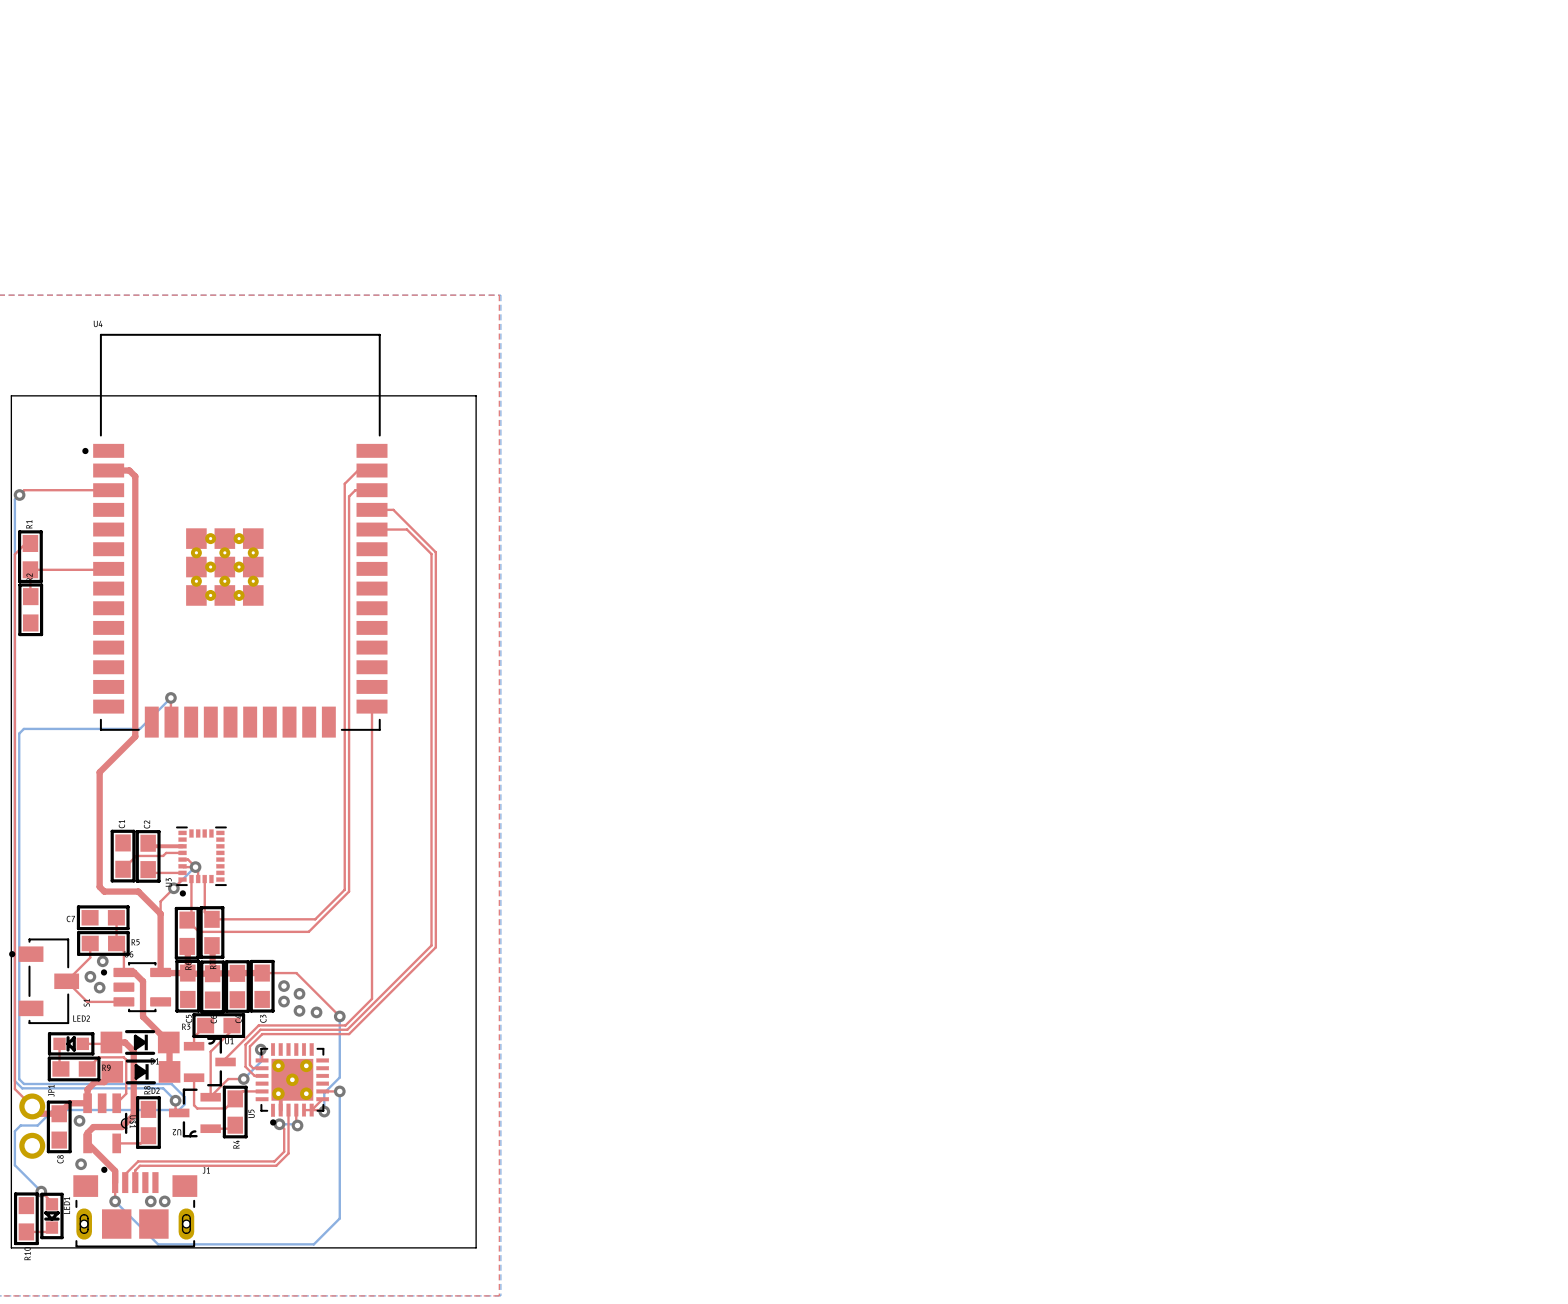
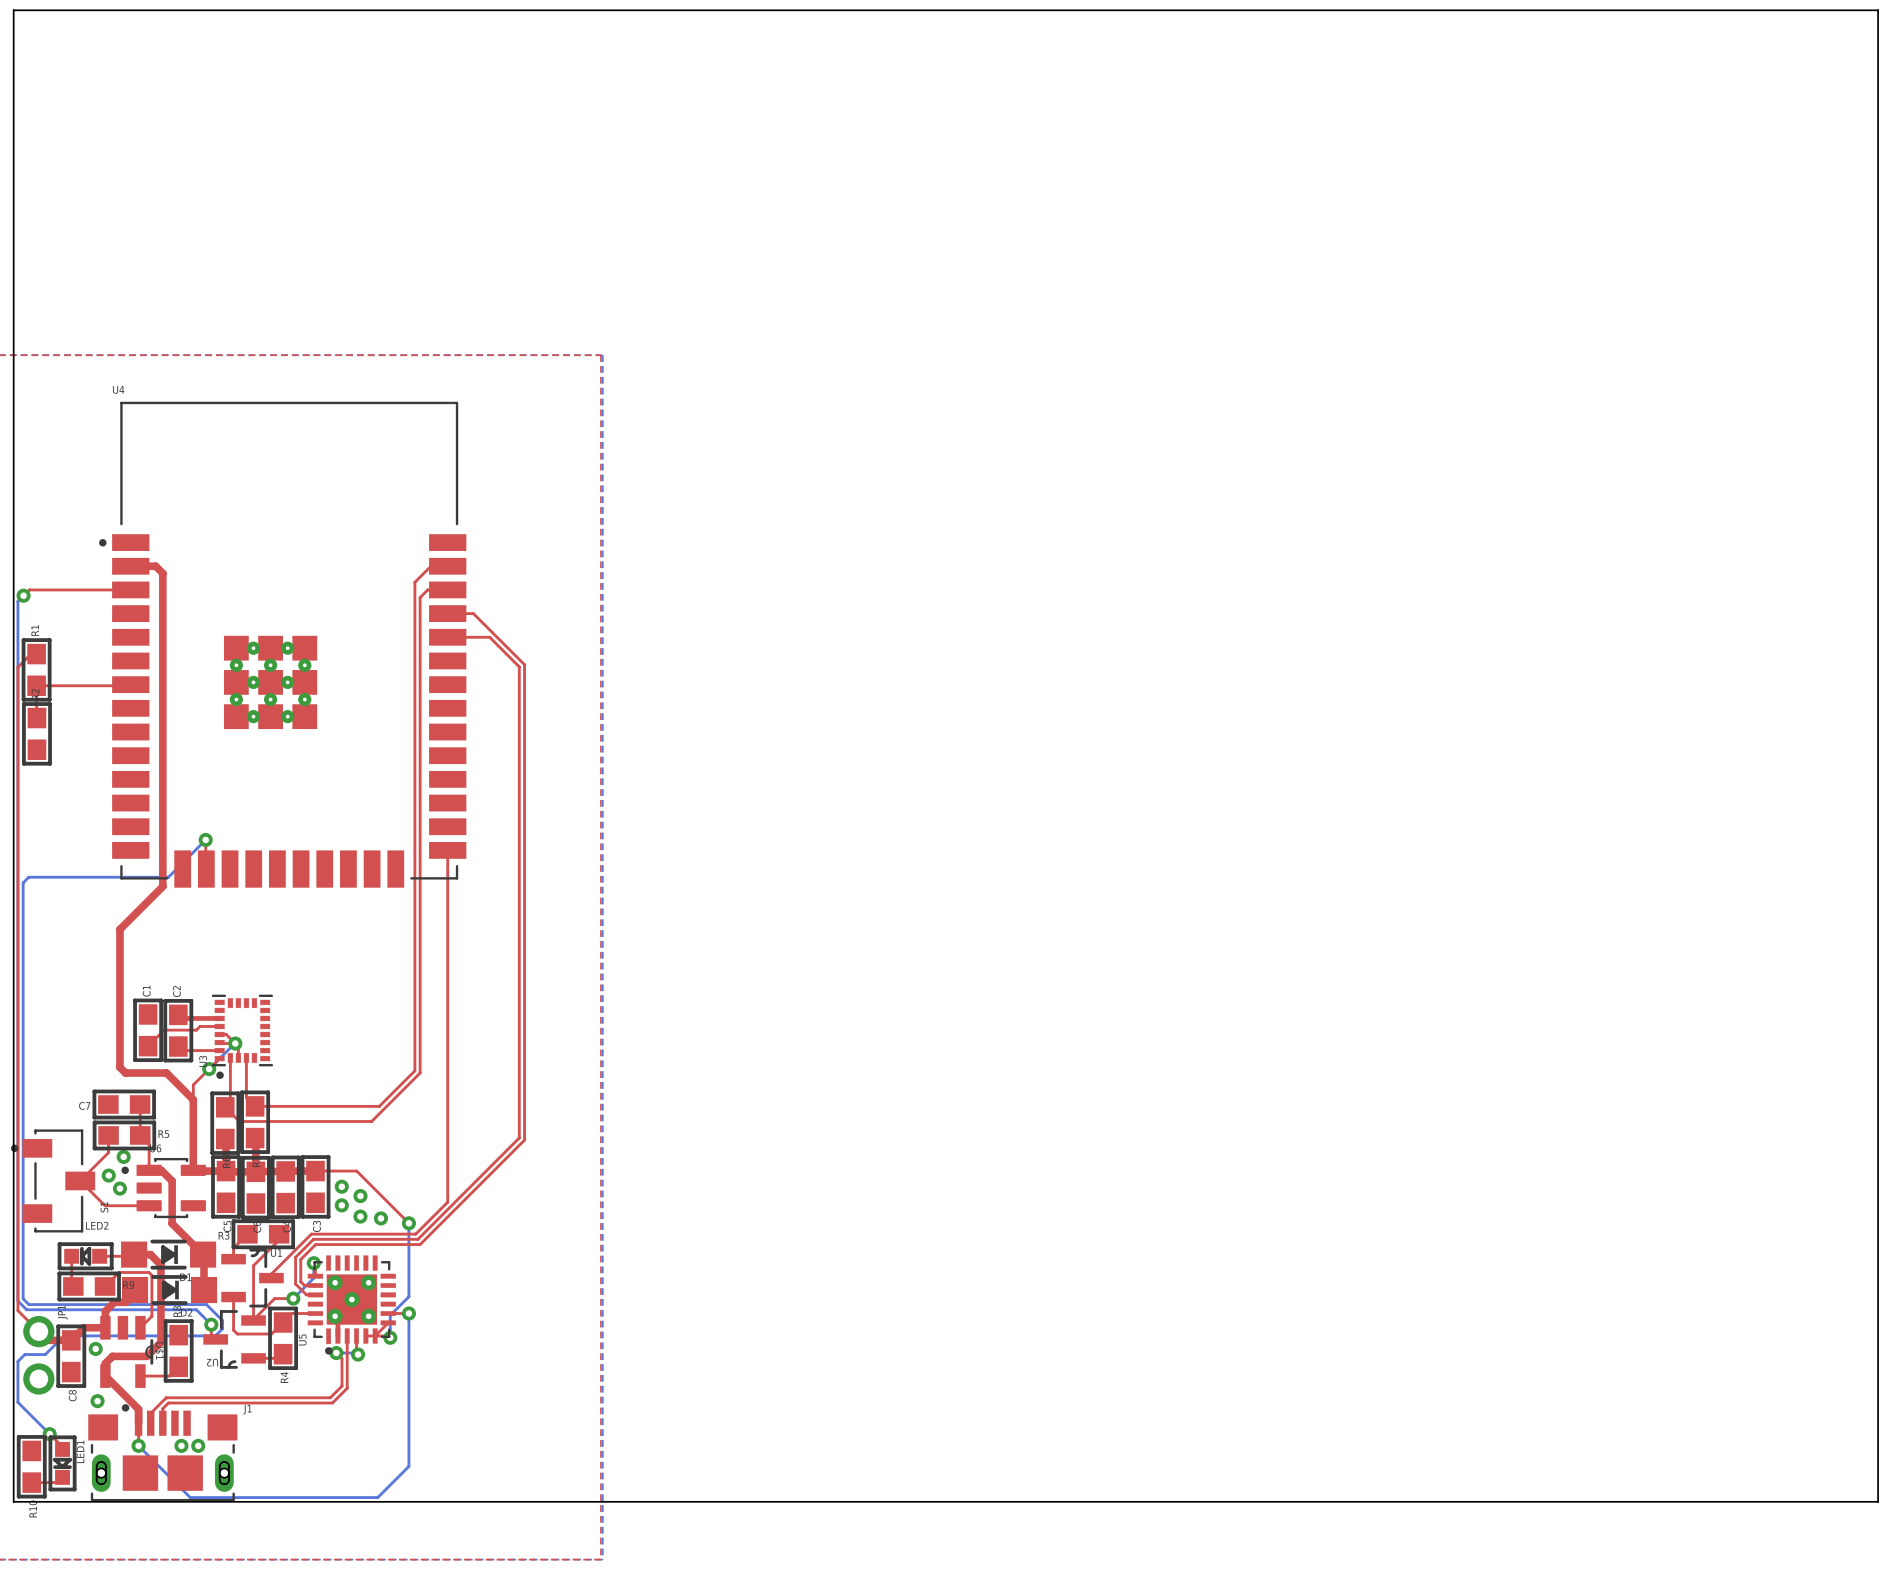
board edge: (11, 395) (476, 395) (476, 1247) -> (13, 476) (13, 10) (1878, 10) (1878, 1501) (572, 1501)

